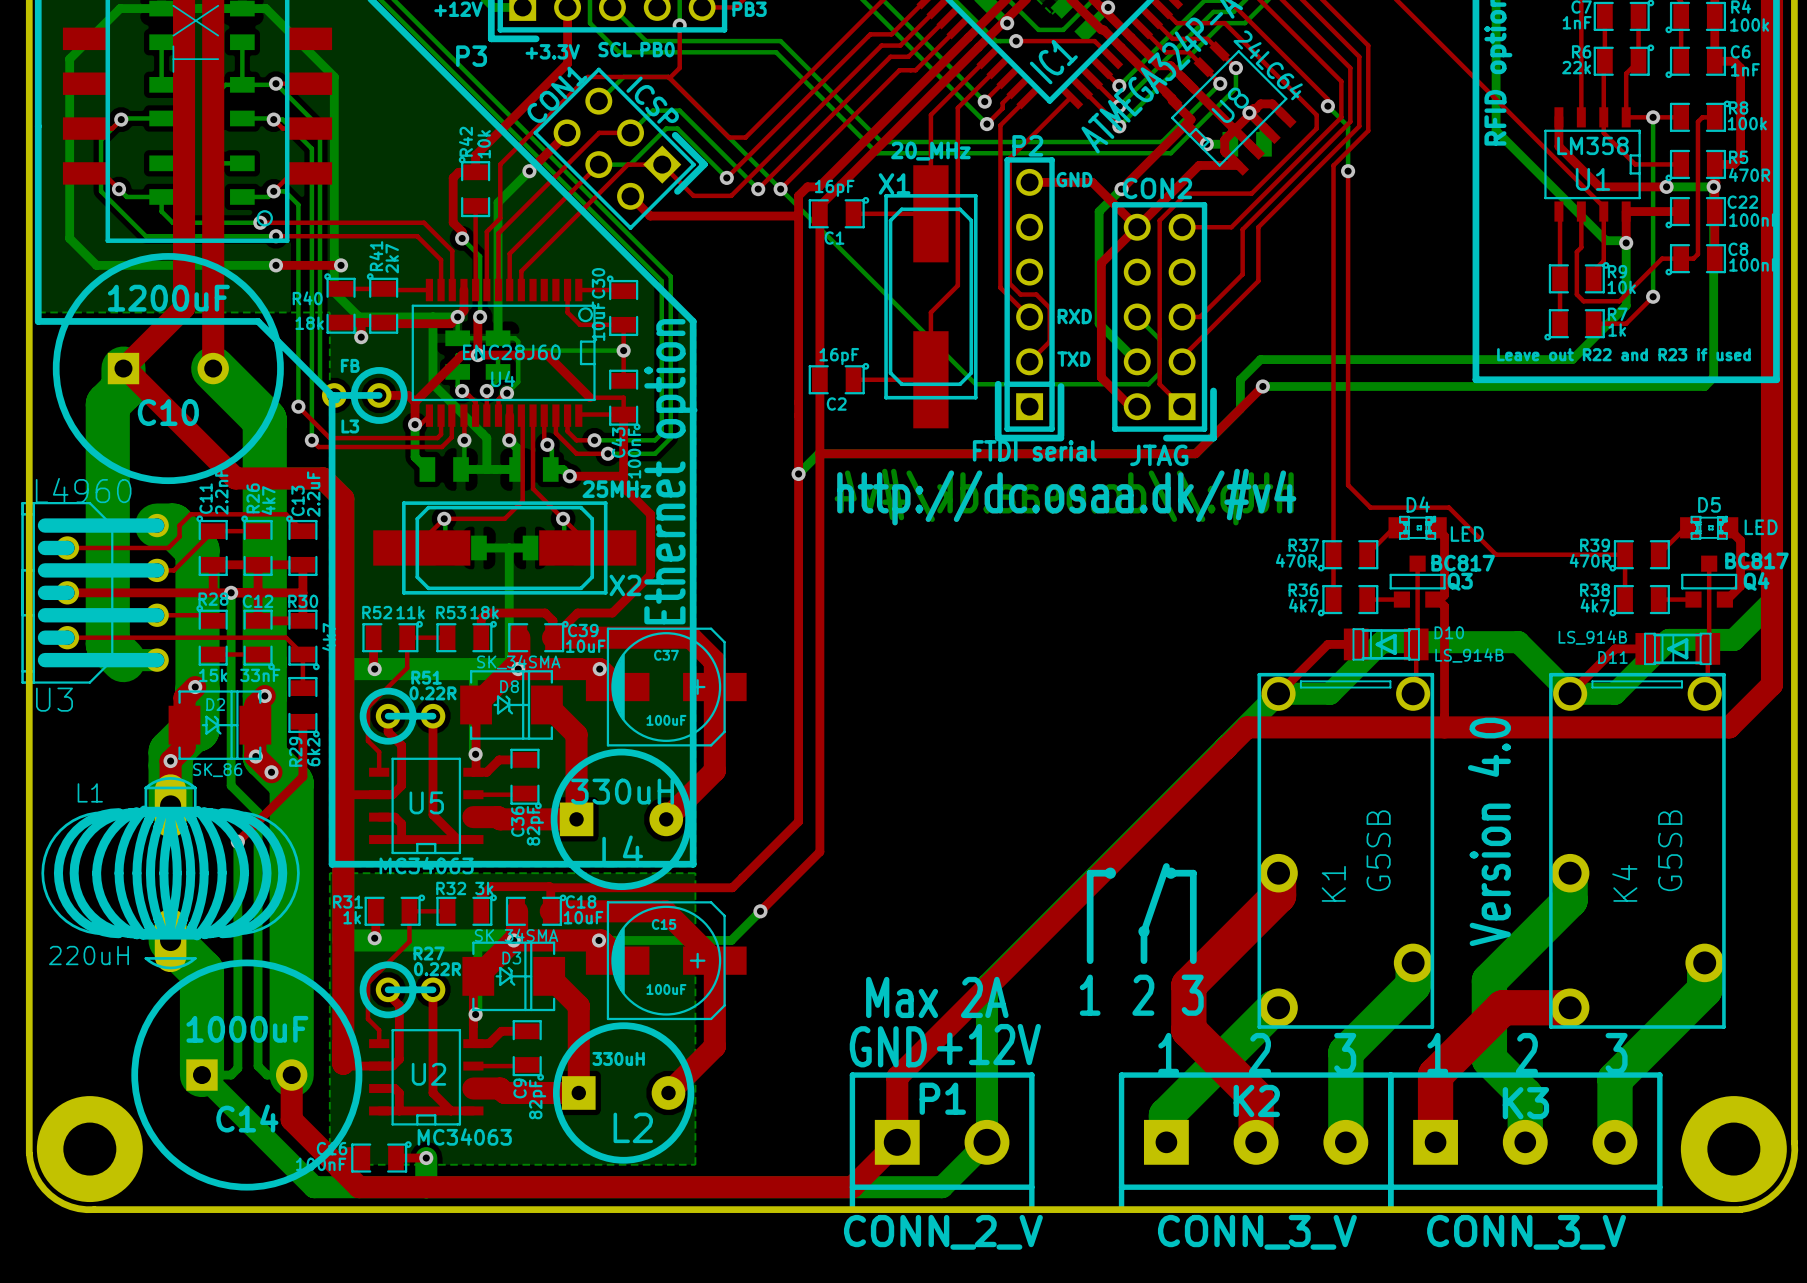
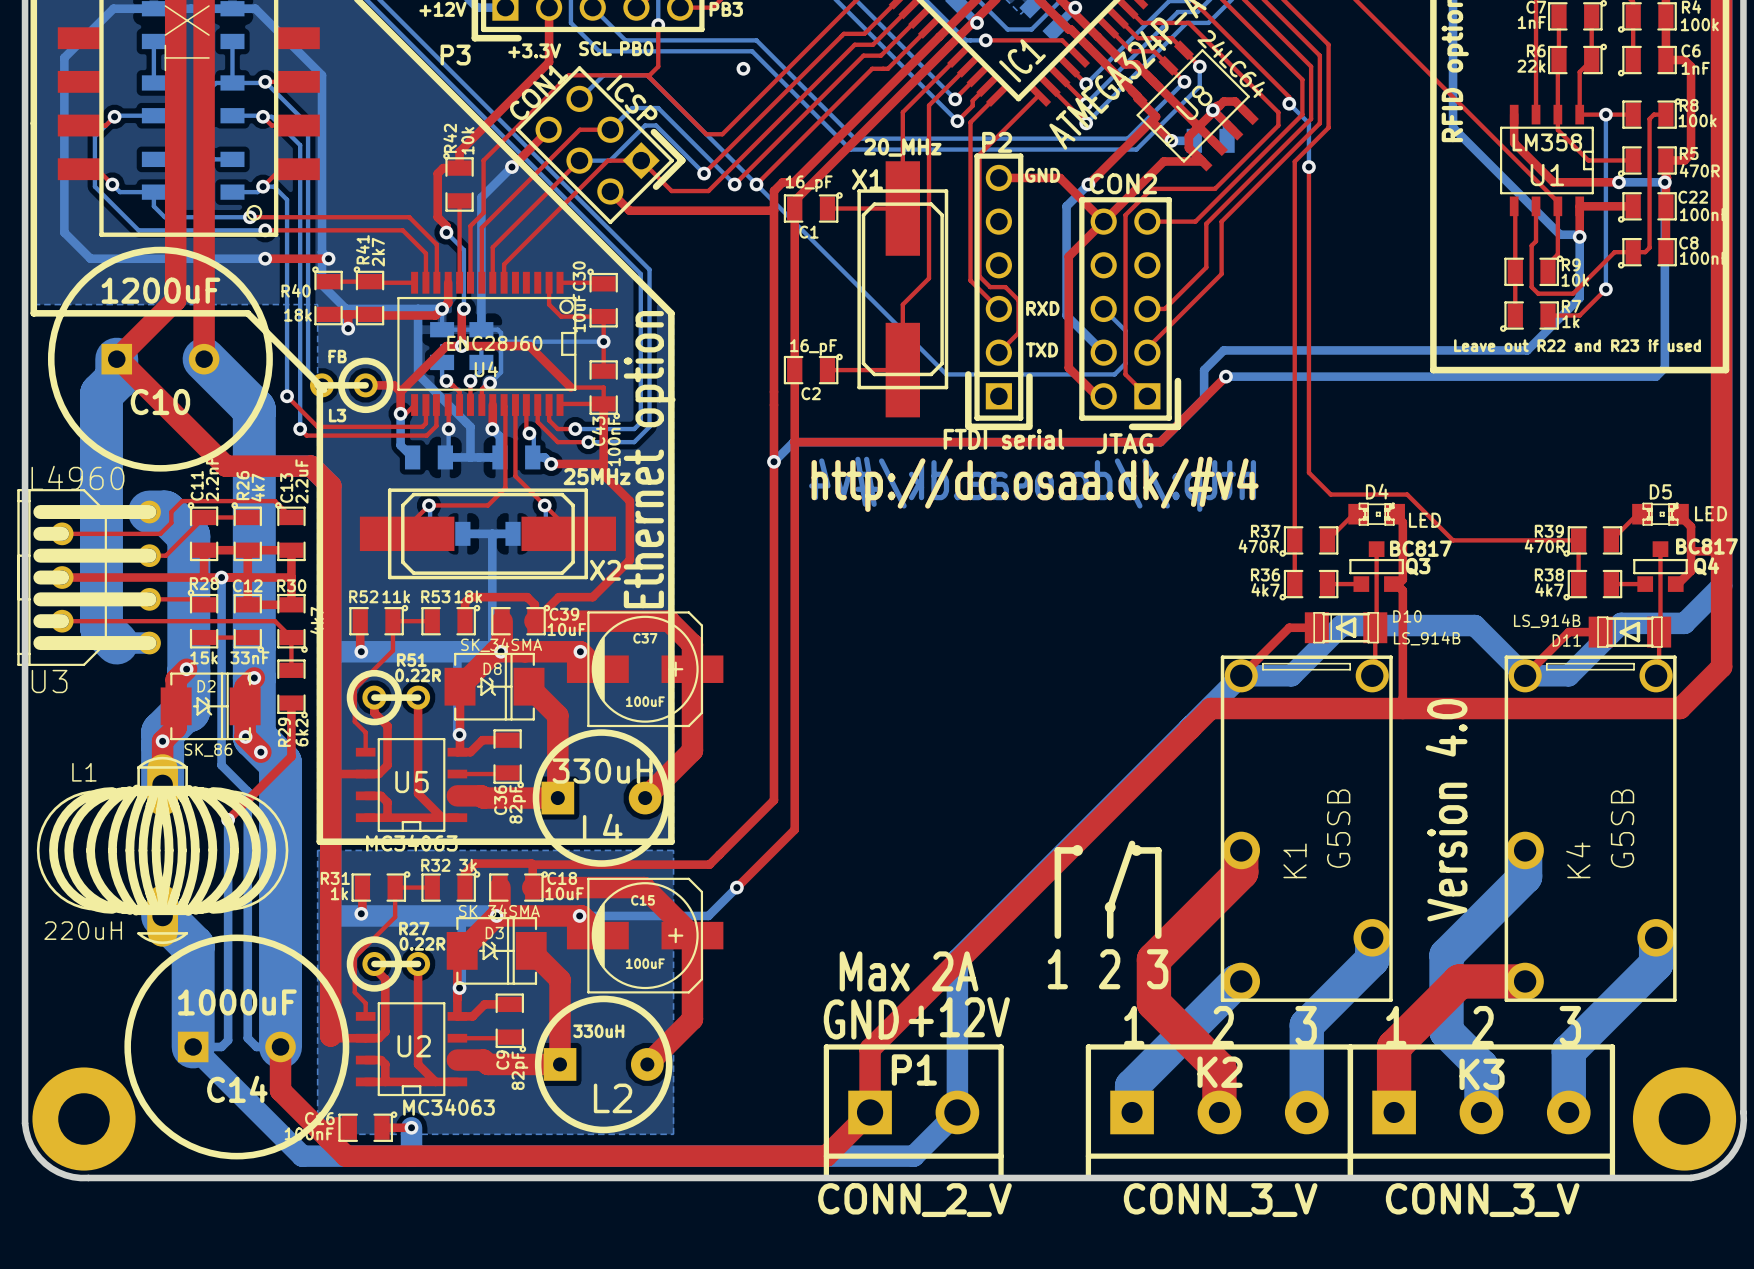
via: none -> (743, 68)
C1 value: 16pF (834, 188) -> 16_pF (809, 183)
C2 value: 16pF (839, 356) -> 16_pF (813, 347)

